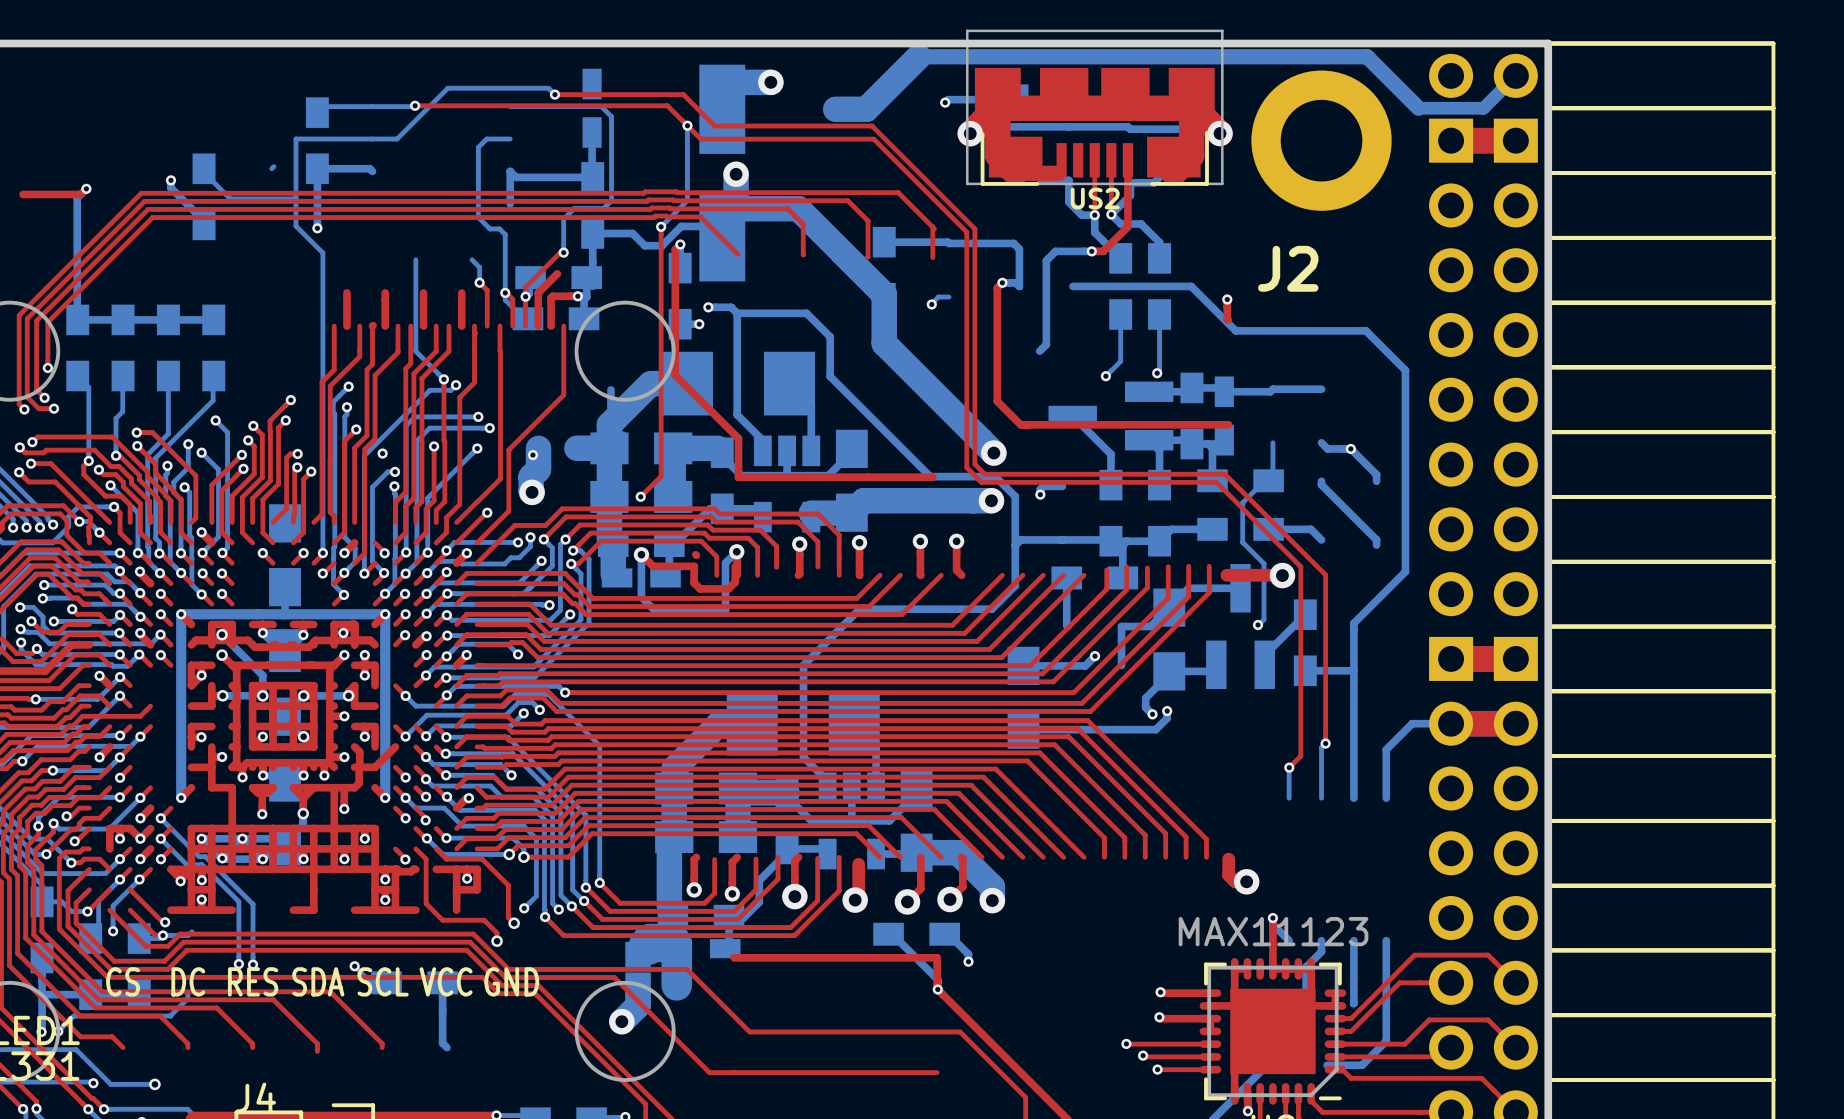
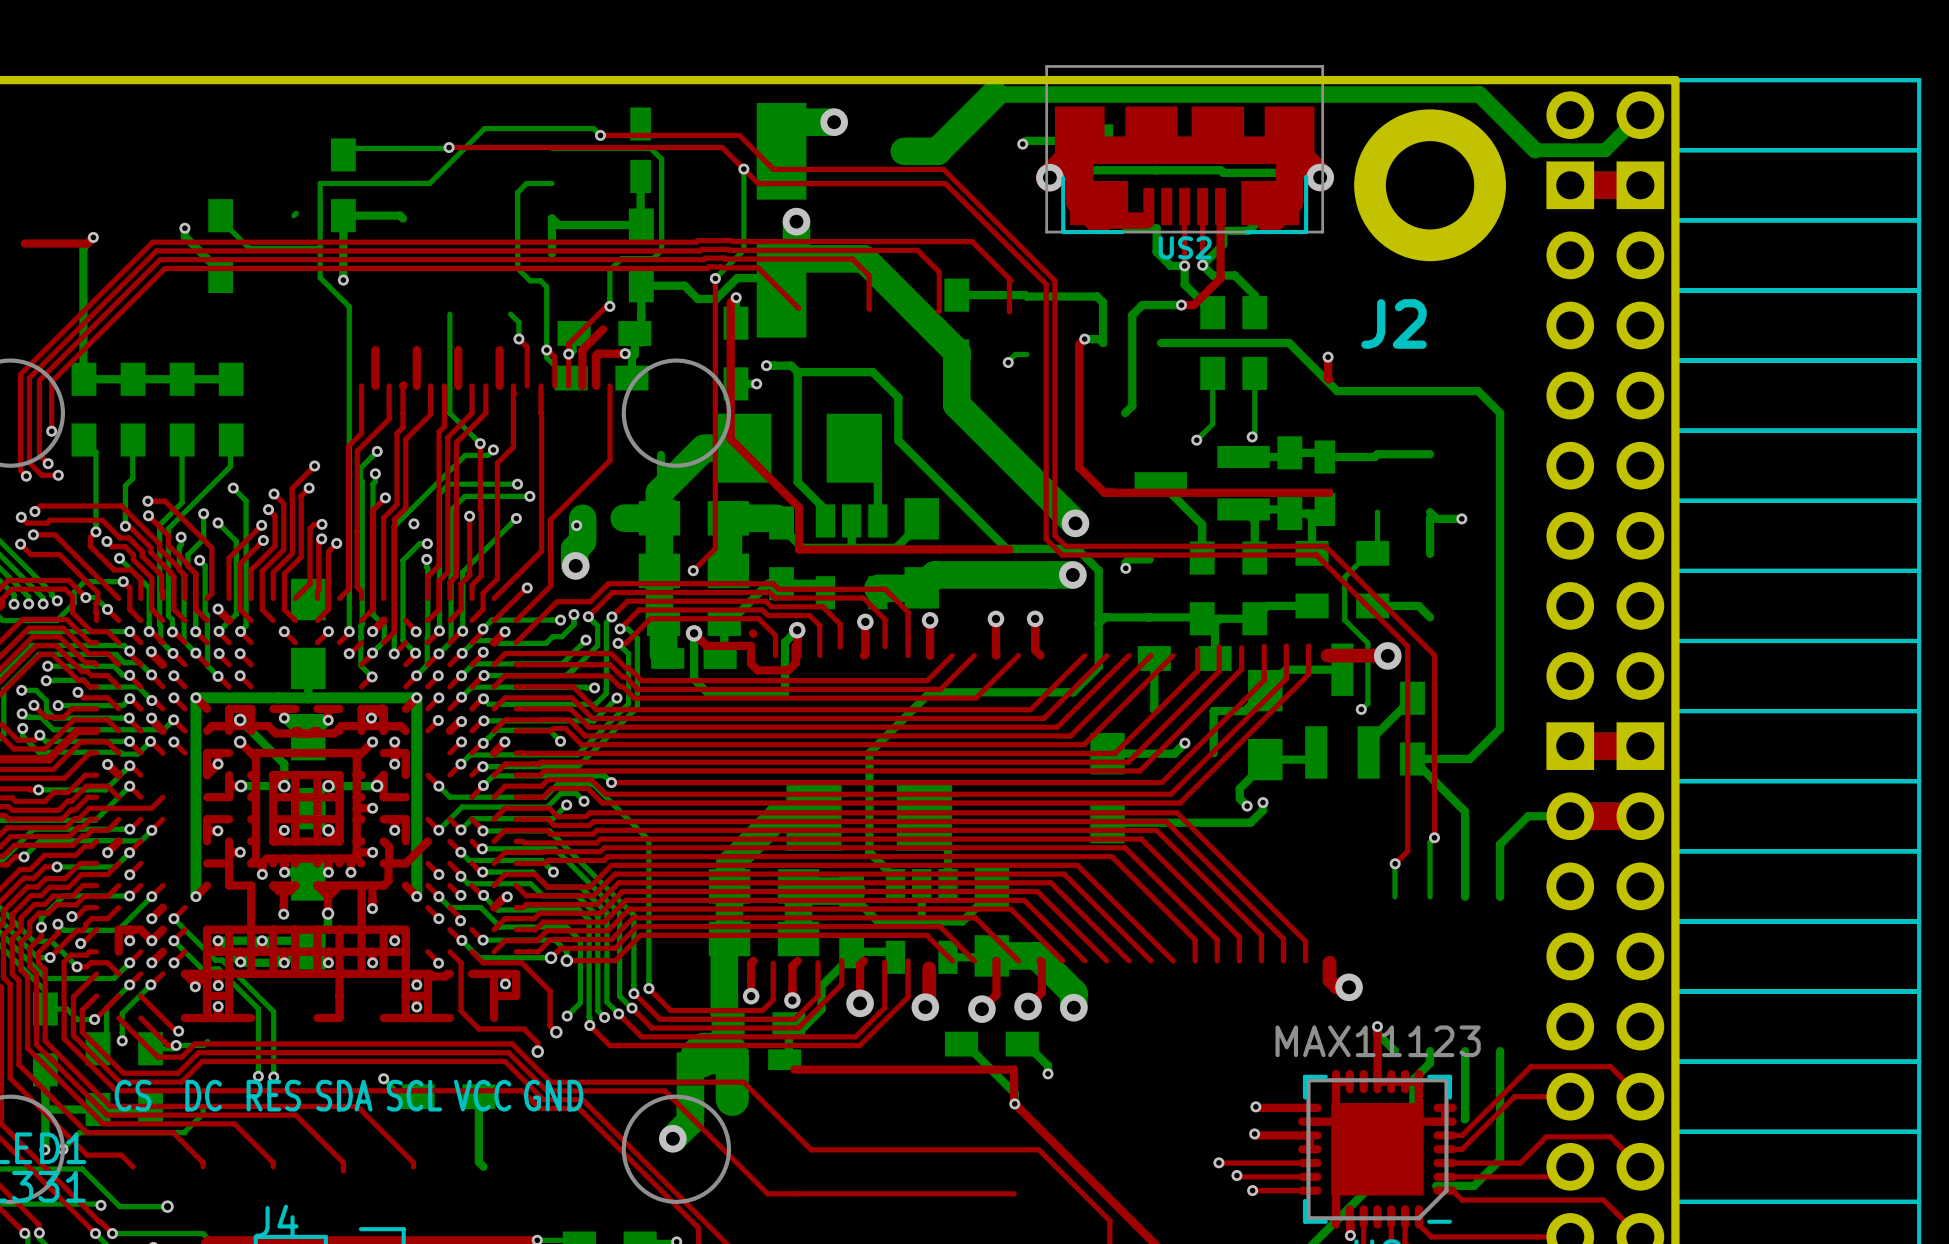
bottom track: (1386, 351) (1405, 370) (1405, 571) (1353, 623) (1353, 719) -> (1500, 413) (1500, 728) (1469, 758) (1464, 758)
bottom track: (1350, 448) (1376, 474) (1376, 481) -> none
bottom track: (1321, 481) (1321, 484) (1376, 539) (1376, 545) -> (1430, 553) (1430, 517)
bottom track: none -> (1412, 758) (1465, 811)

